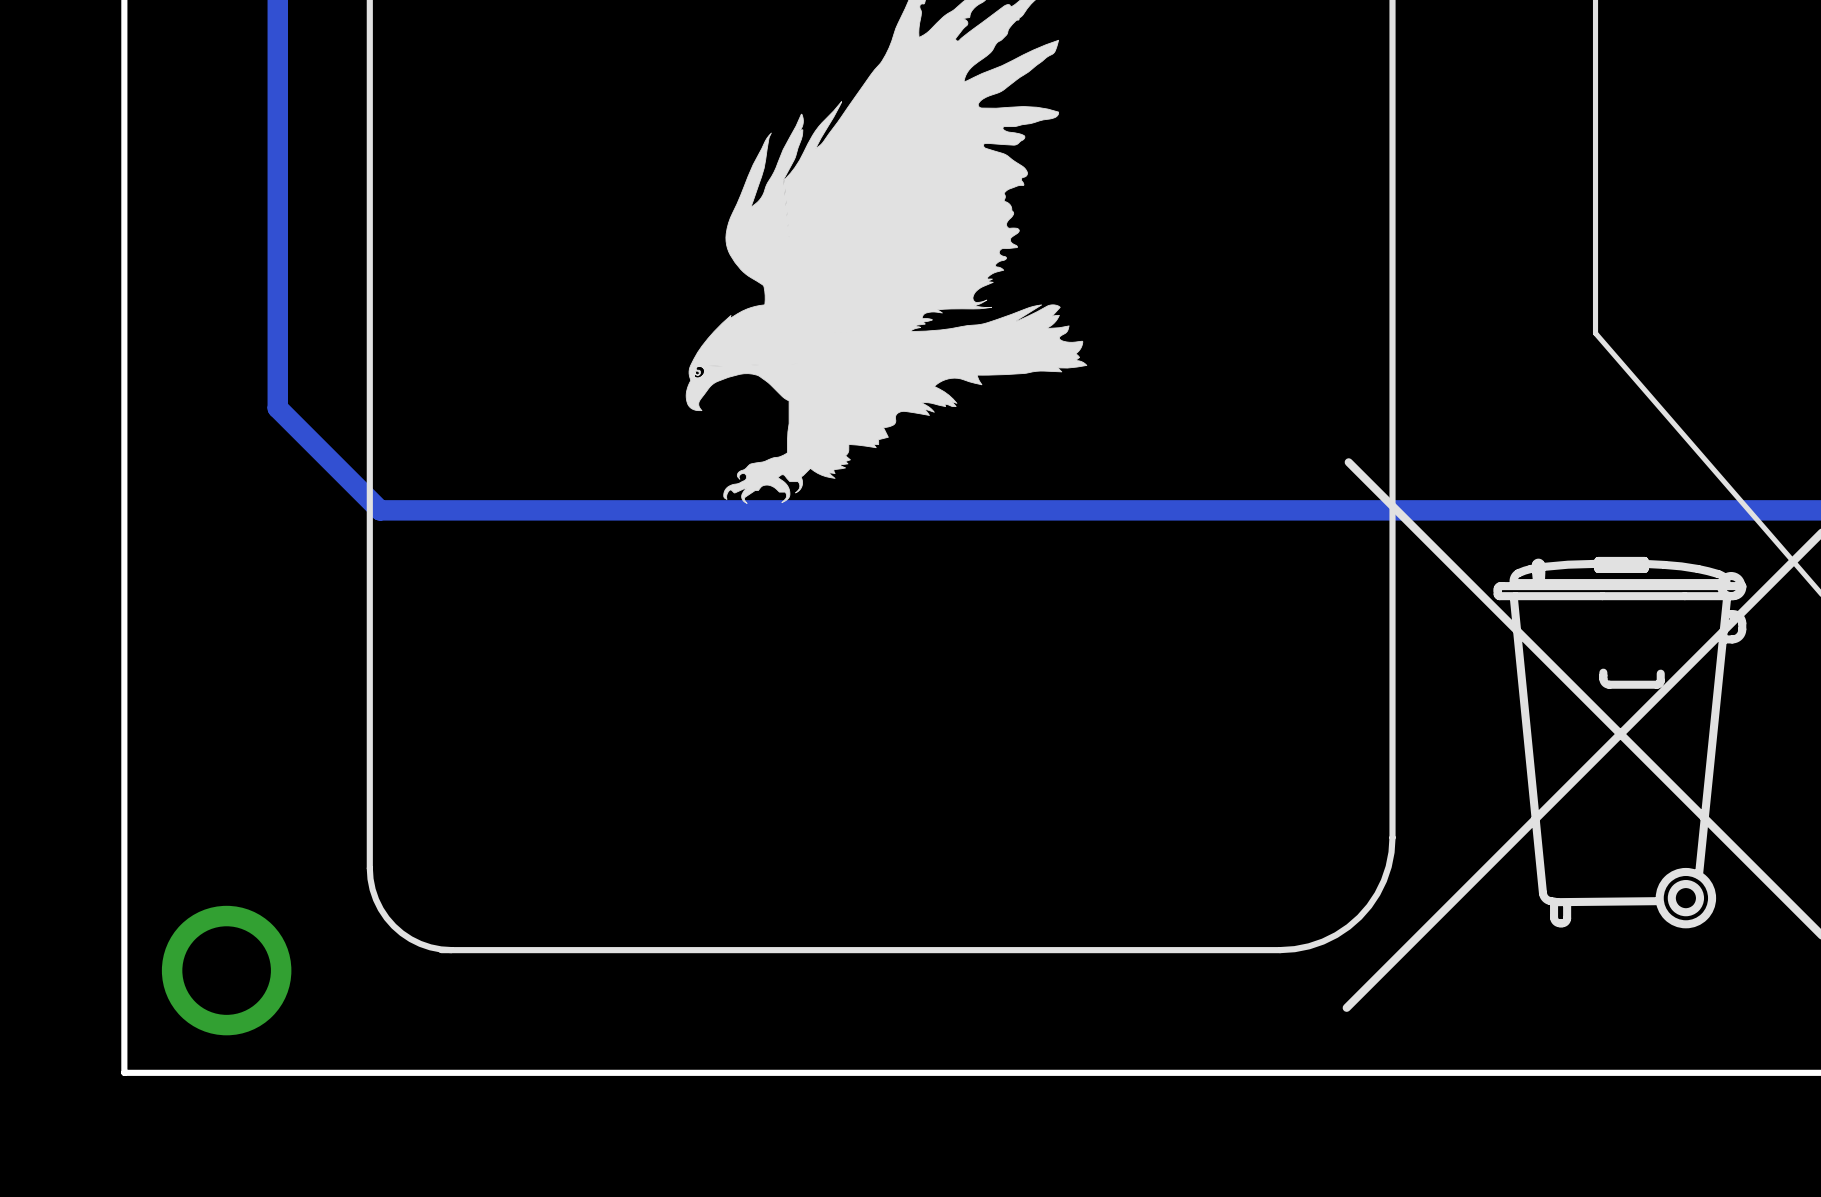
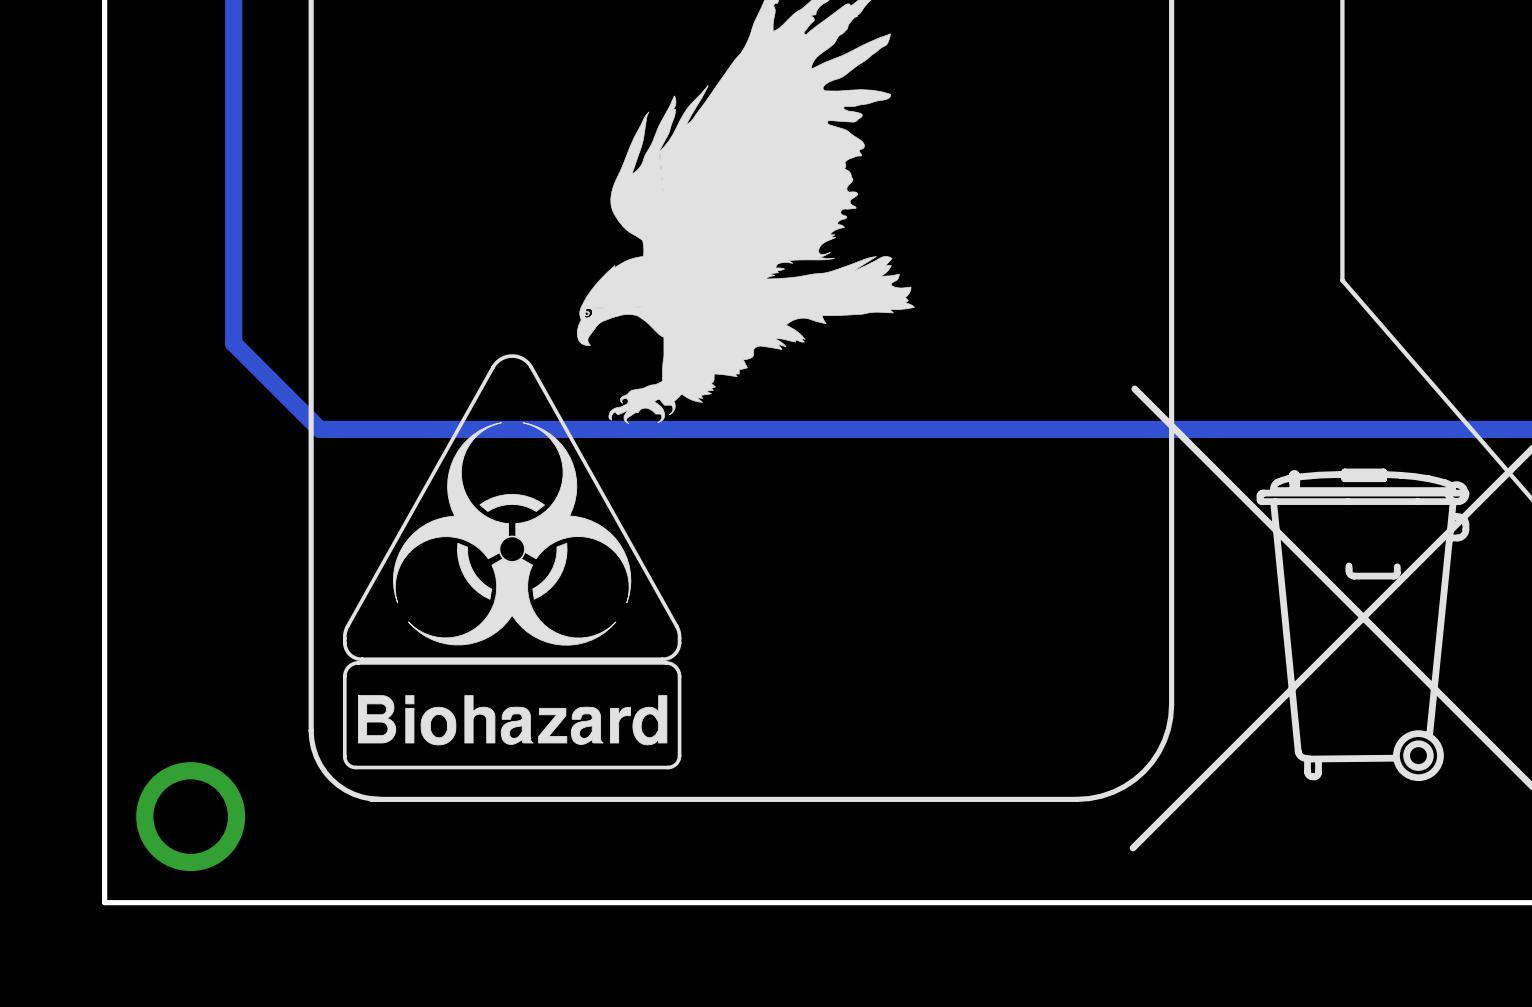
drawing: none -> [342, 354, 682, 770]

